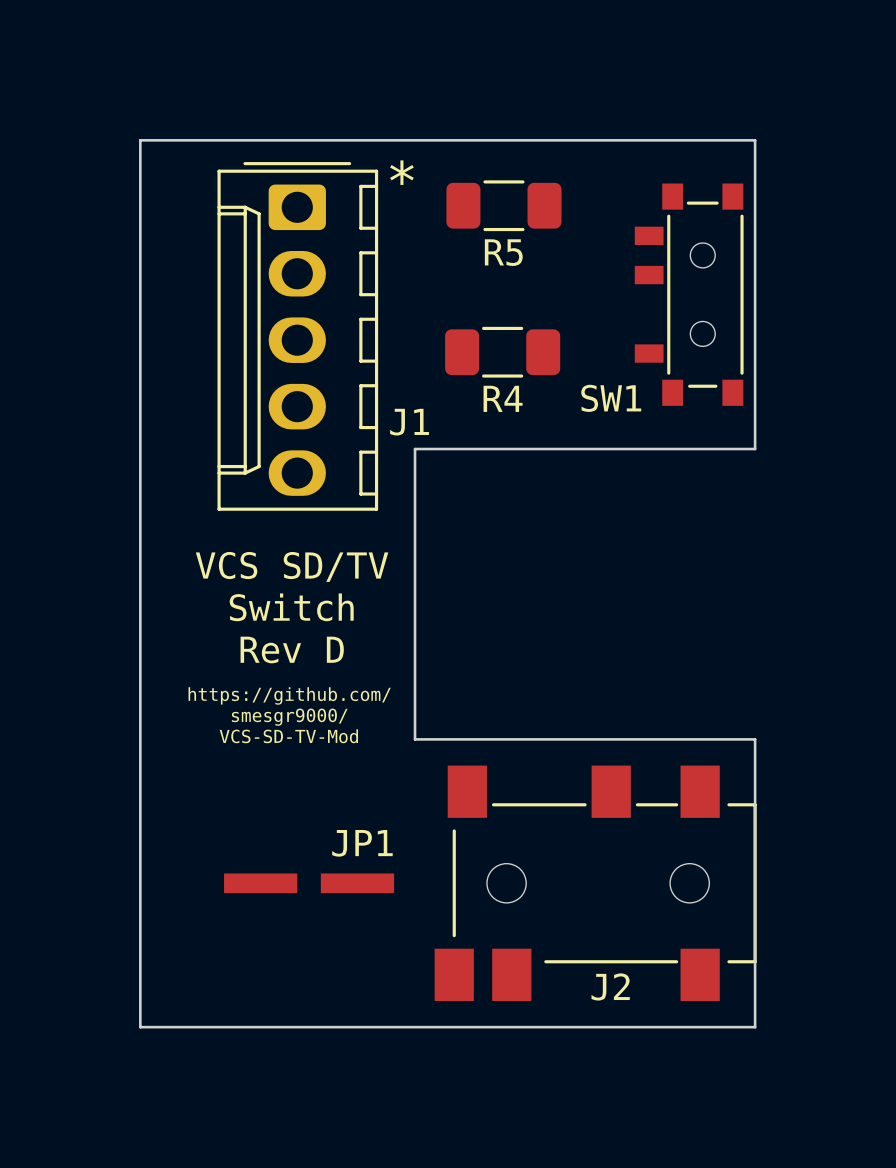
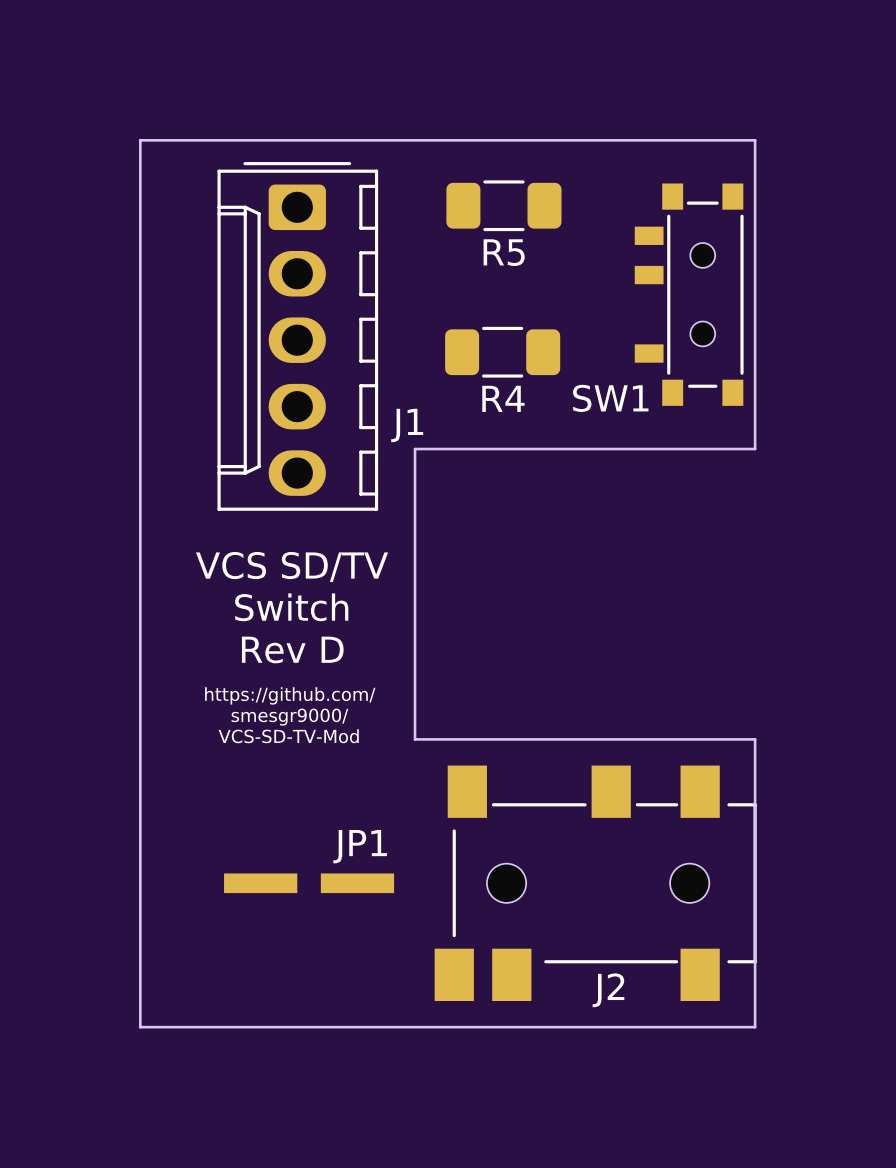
text: * (401, 172) -> none

